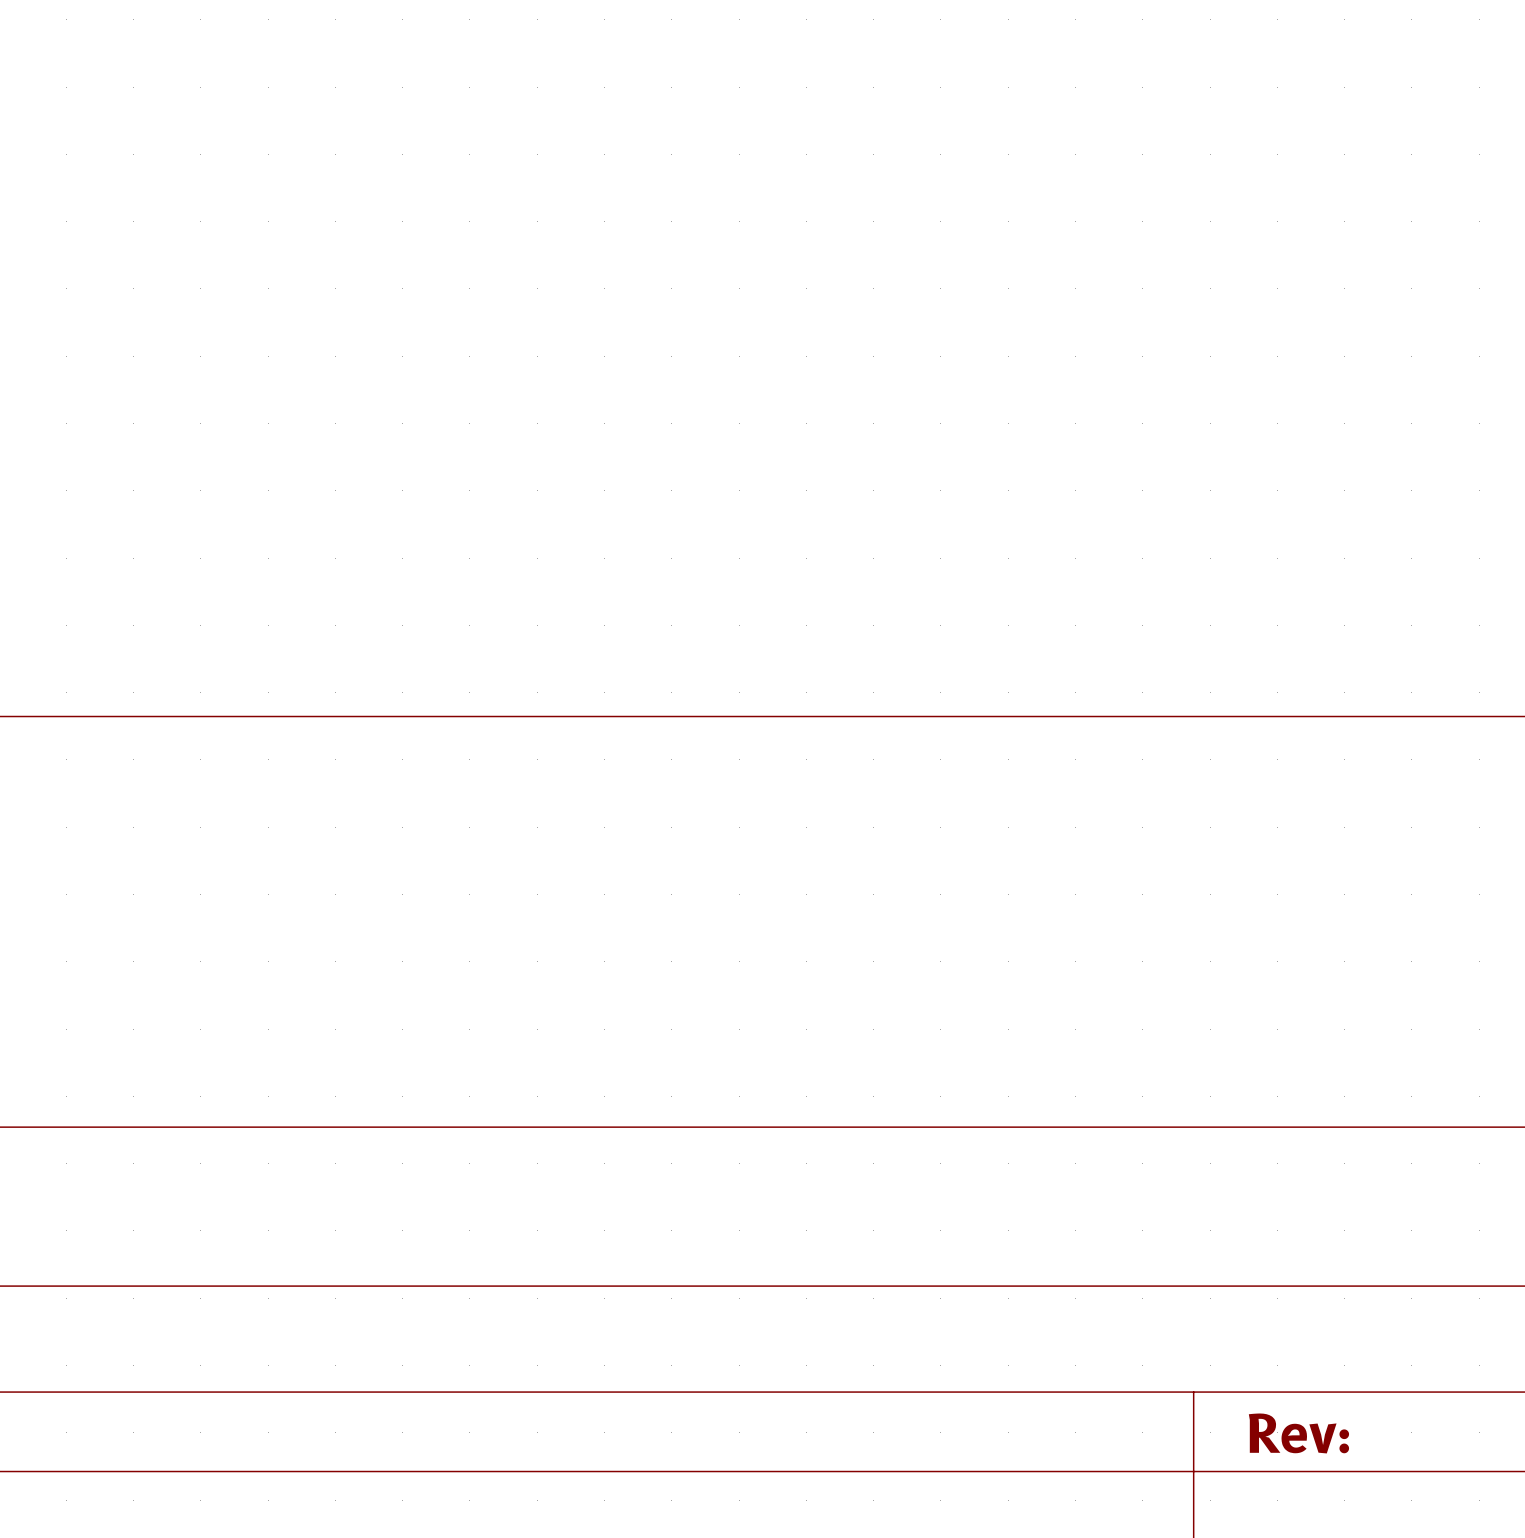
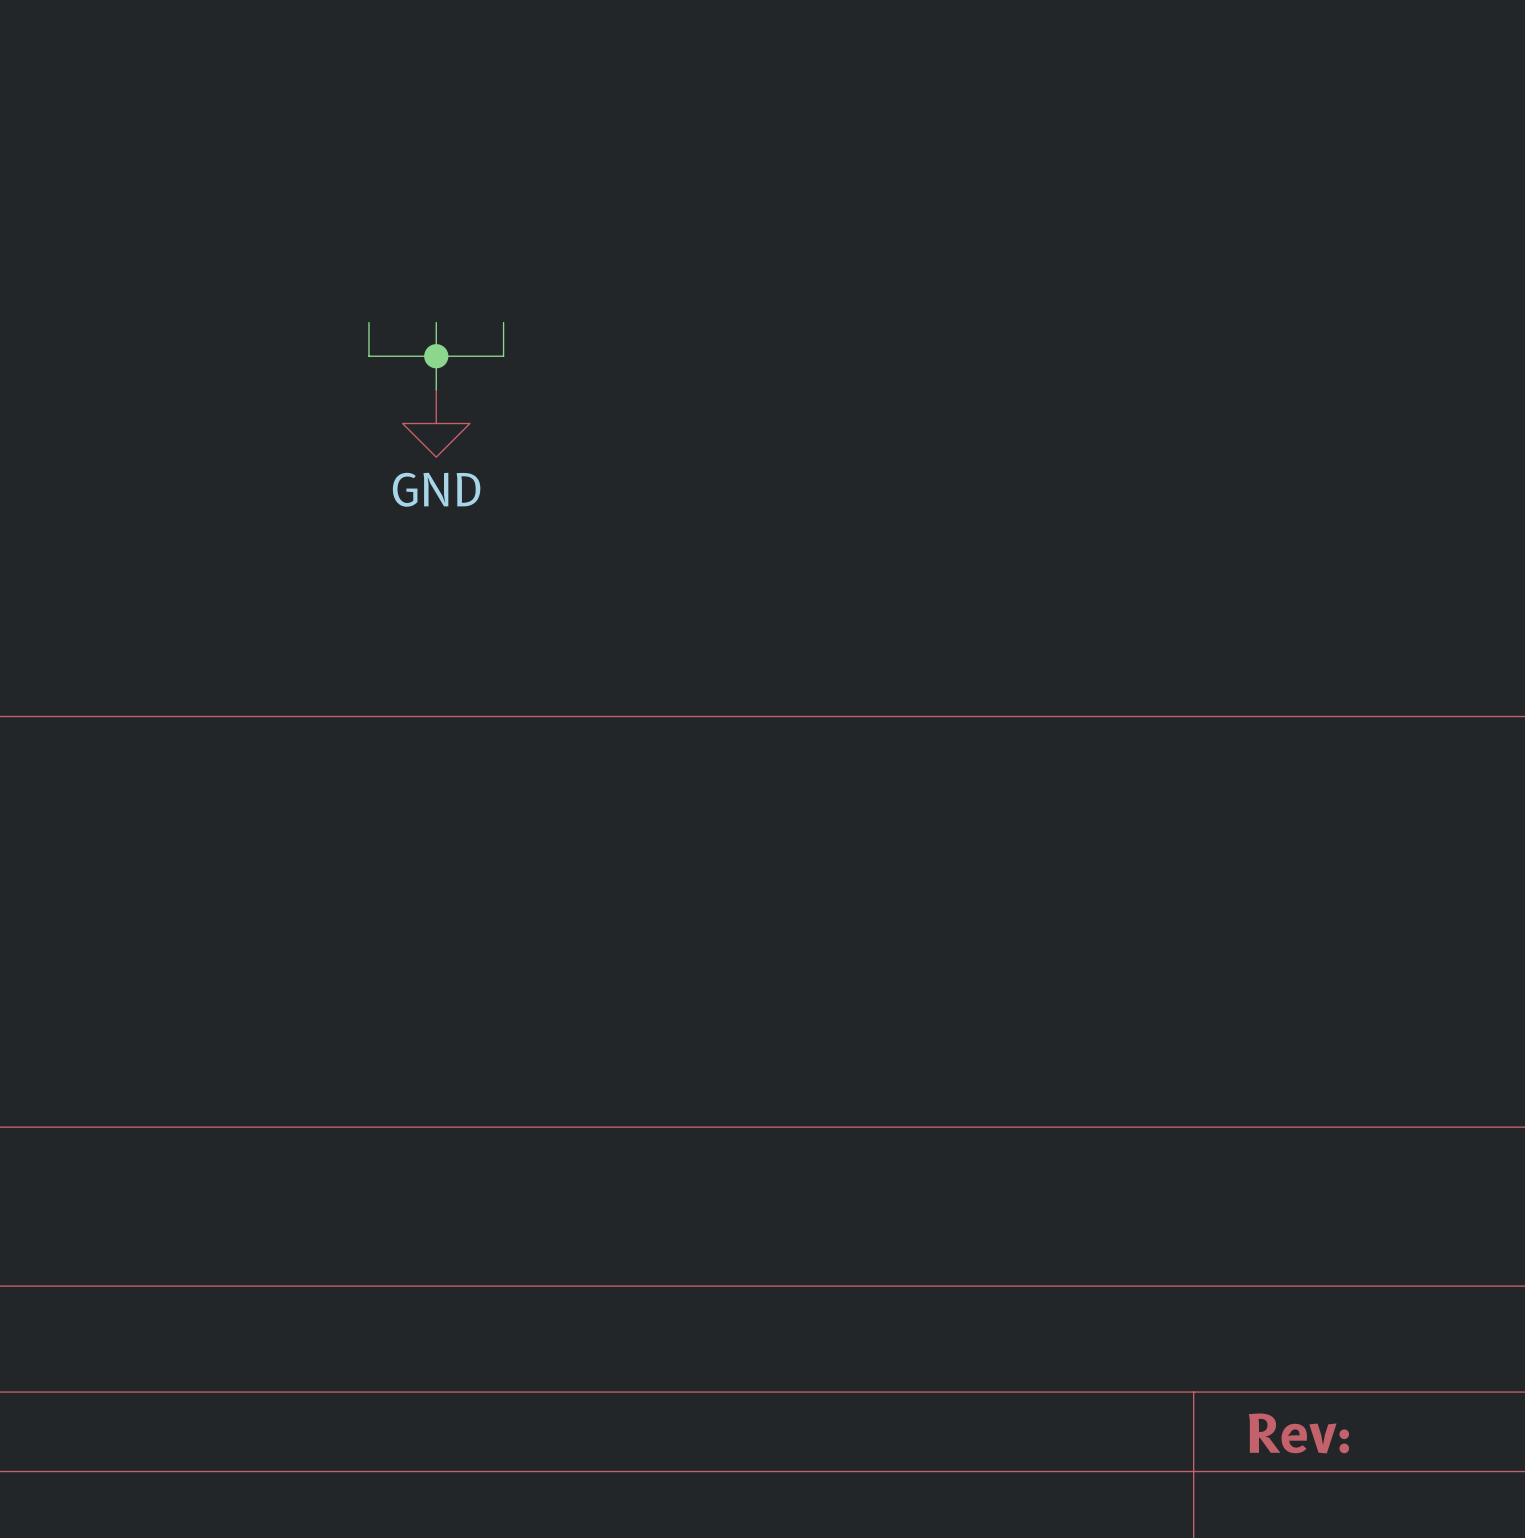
wire: none -> (368, 322) (368, 356) (503, 356) (503, 322)
wire: none -> (436, 322) (436, 389)
junction: none -> (436, 356)
power symbol: none -> GND (436, 423)

